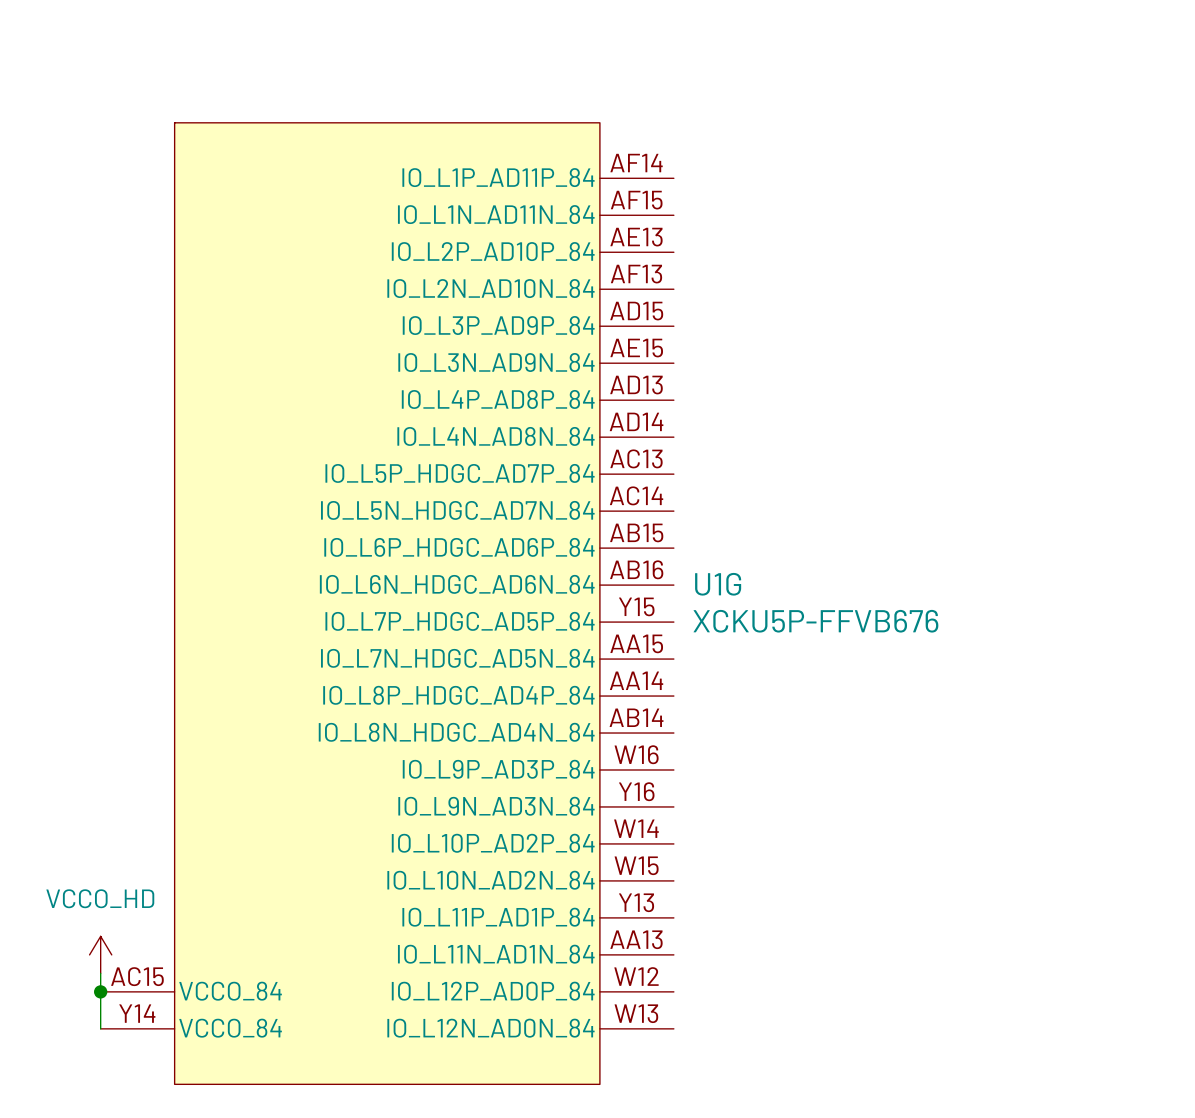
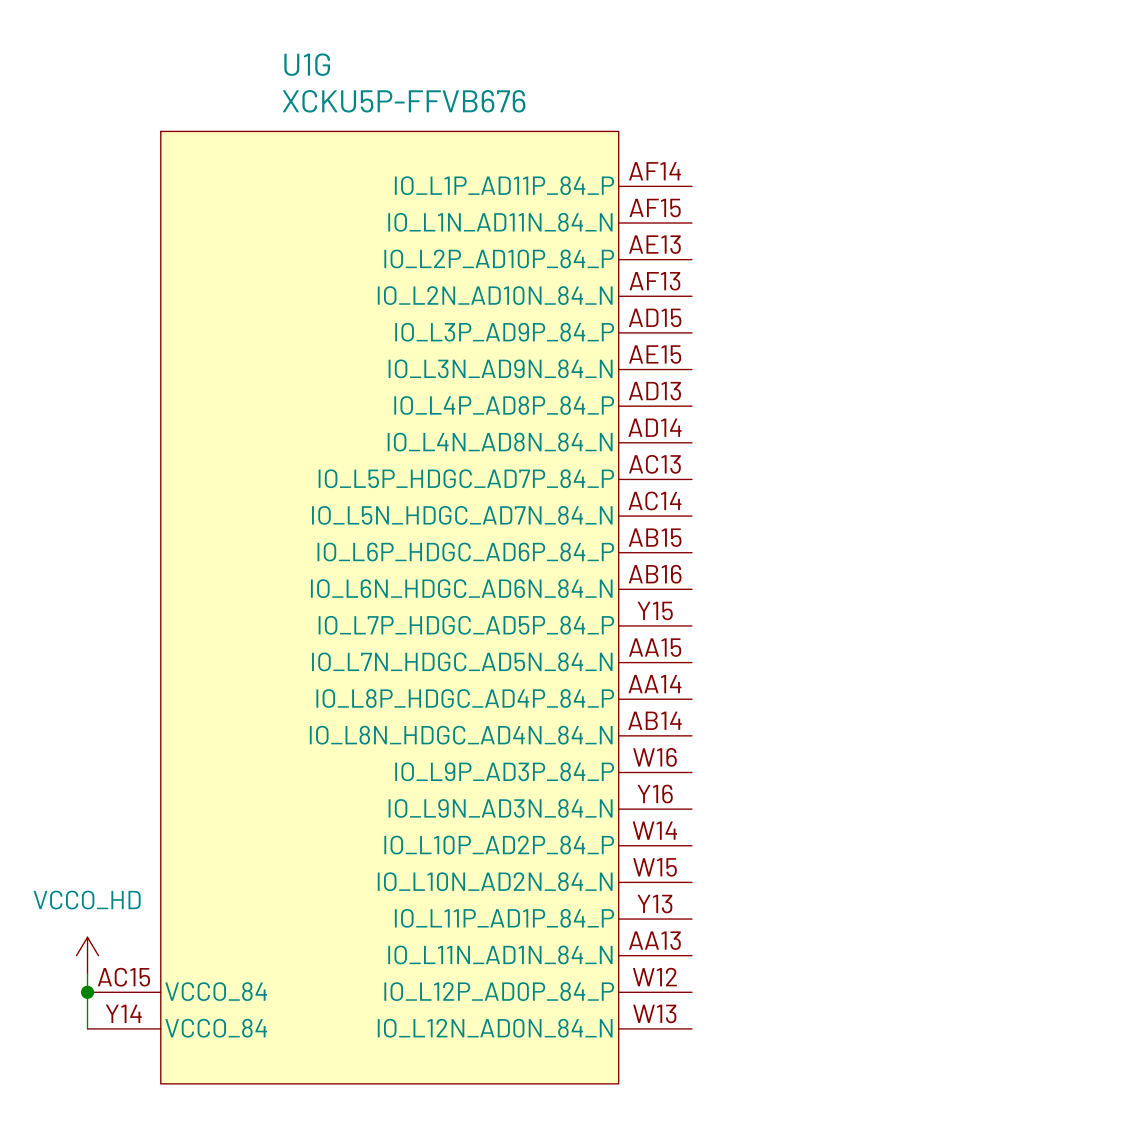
U1G symbol: [100, 122, 674, 1085] -> [87, 131, 692, 1084]
U1G name position: U1G (718, 584) -> U1G (307, 64)
U1G value position: XCKU5P-FFVB676 (815, 621) -> XCKU5P-FFVB676 (404, 101)

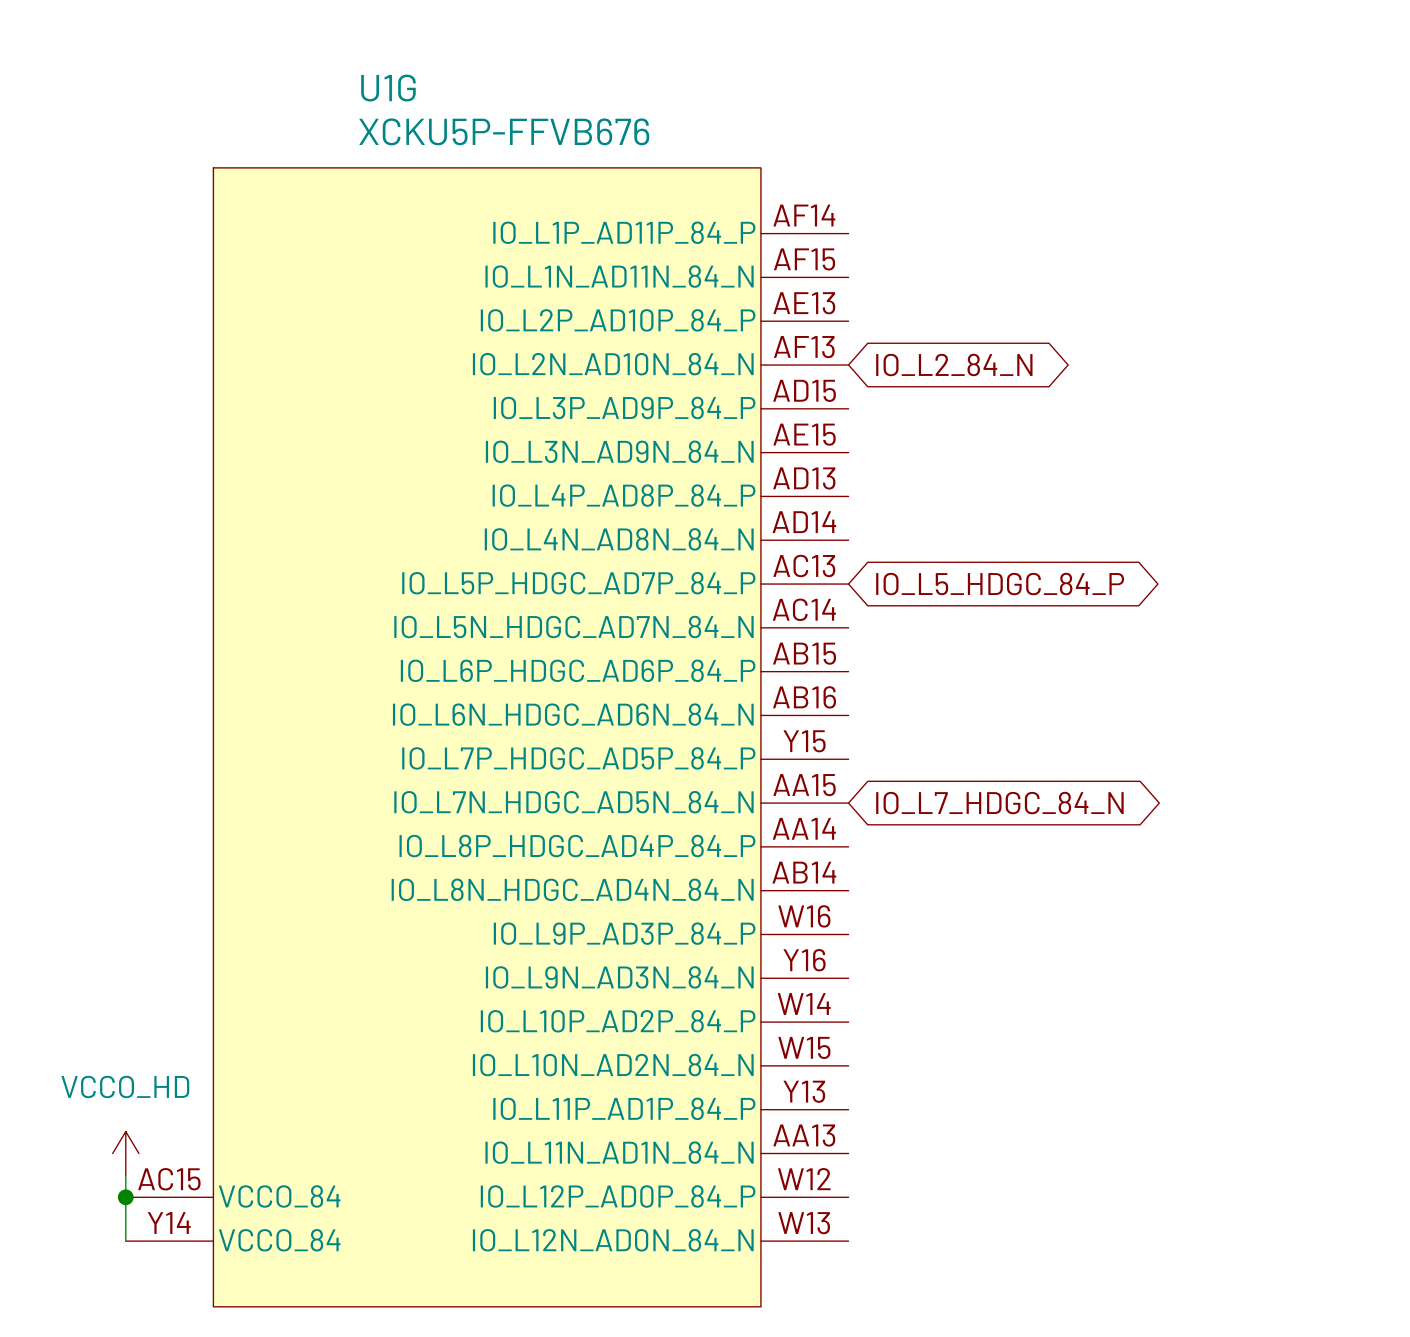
global label: none -> IO_L2_84_N (954, 364)
global label: none -> IO_L5_HDGC_84_P (1000, 584)
global label: none -> IO_L7_HDGC_84_N (999, 803)

